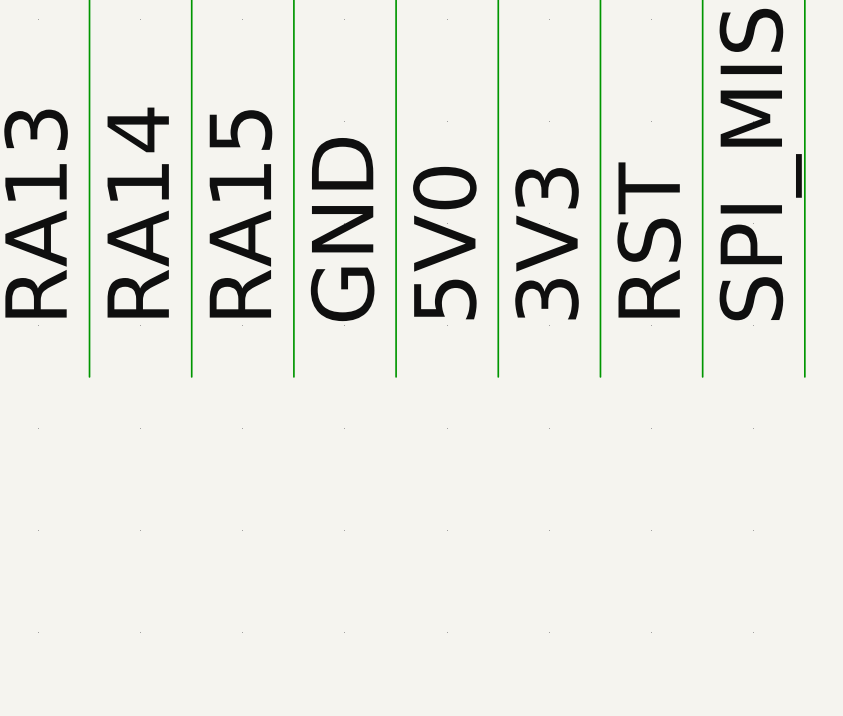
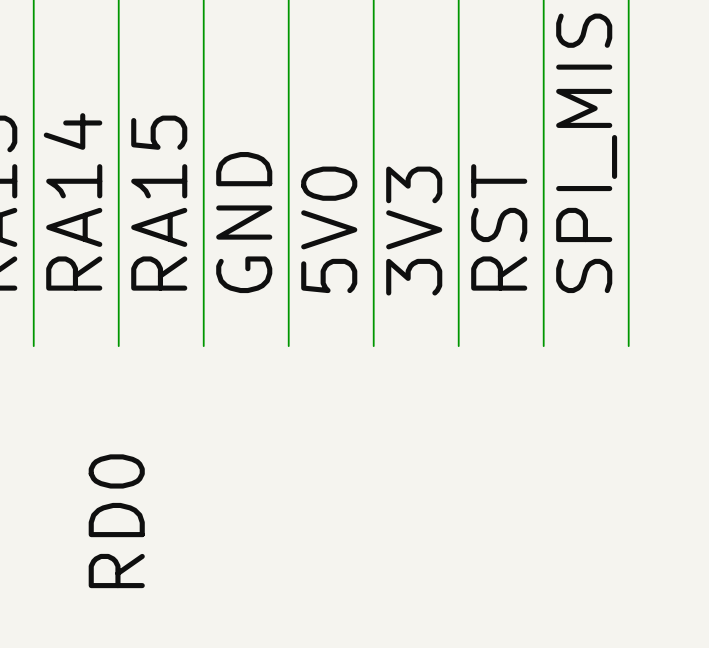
label: none -> RD0 (116, 521)

